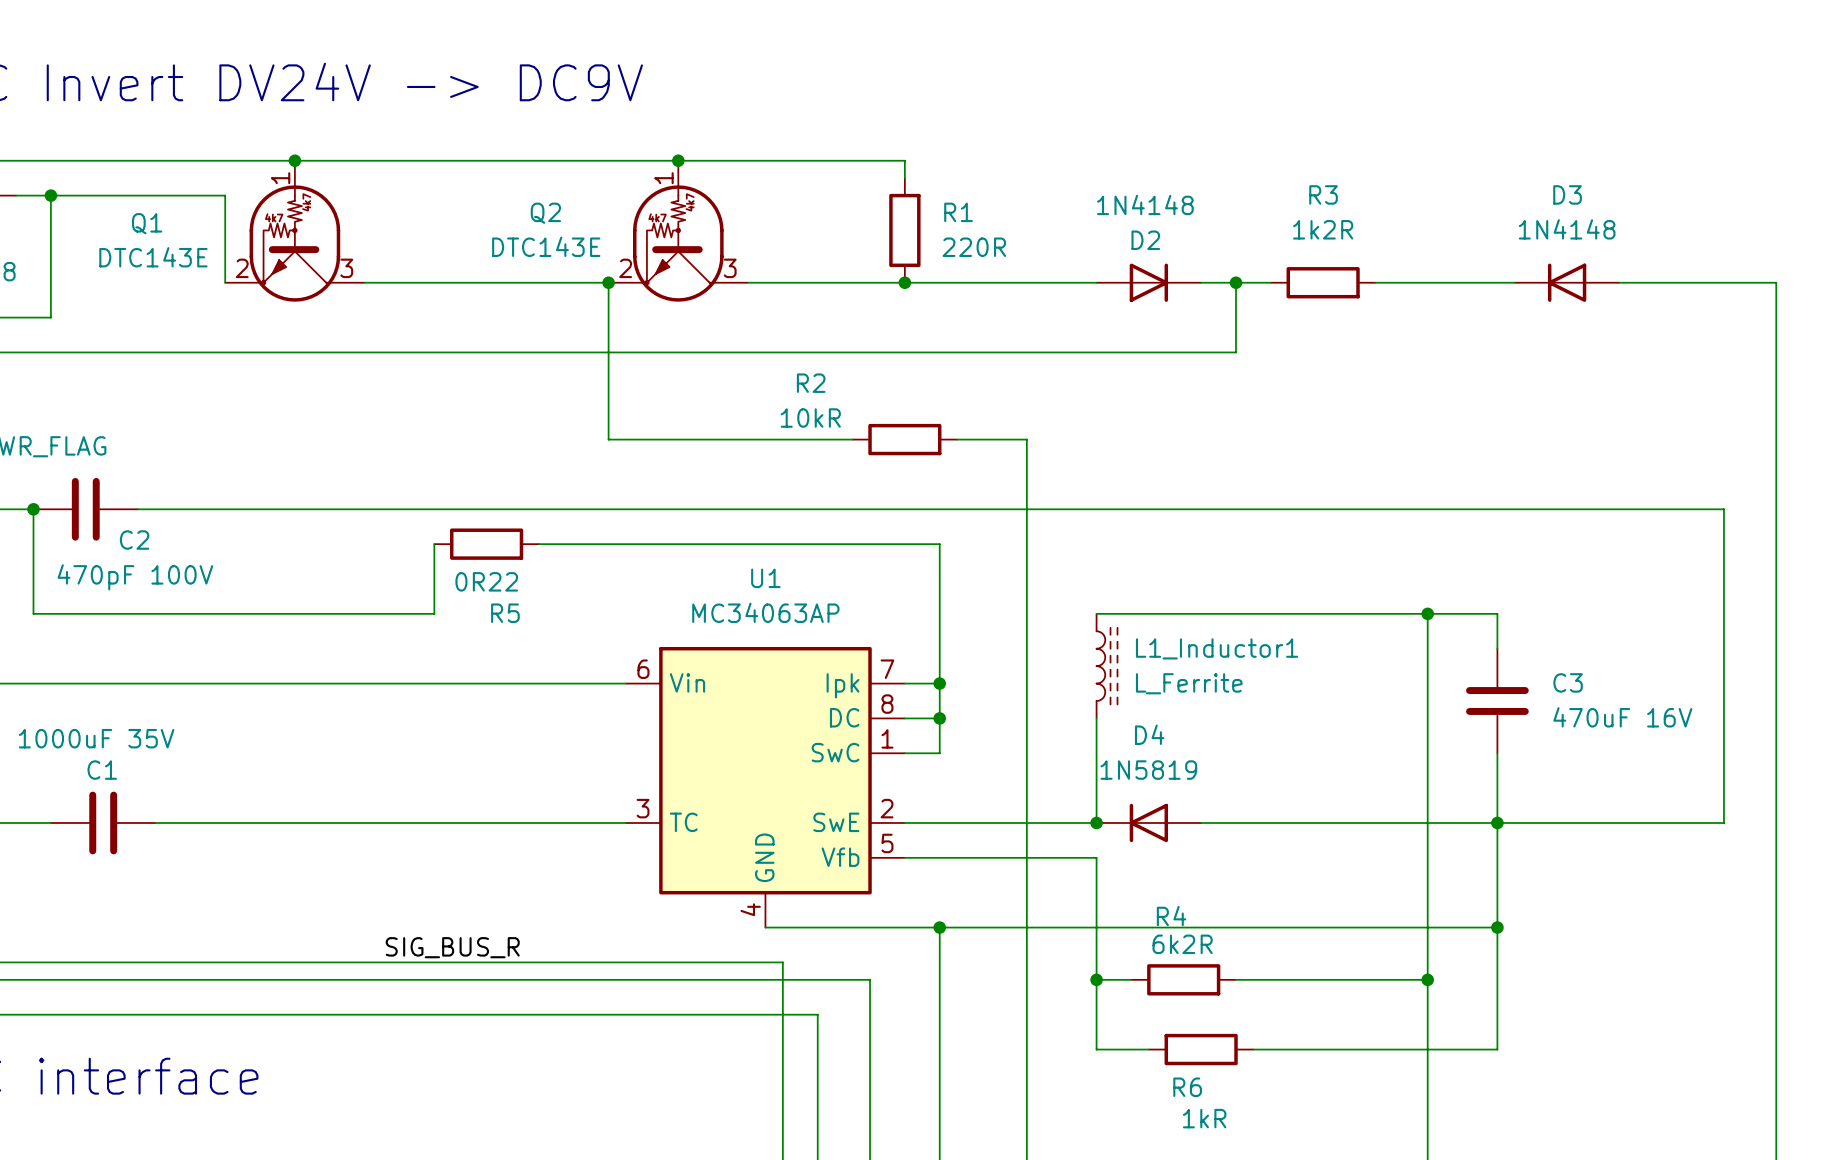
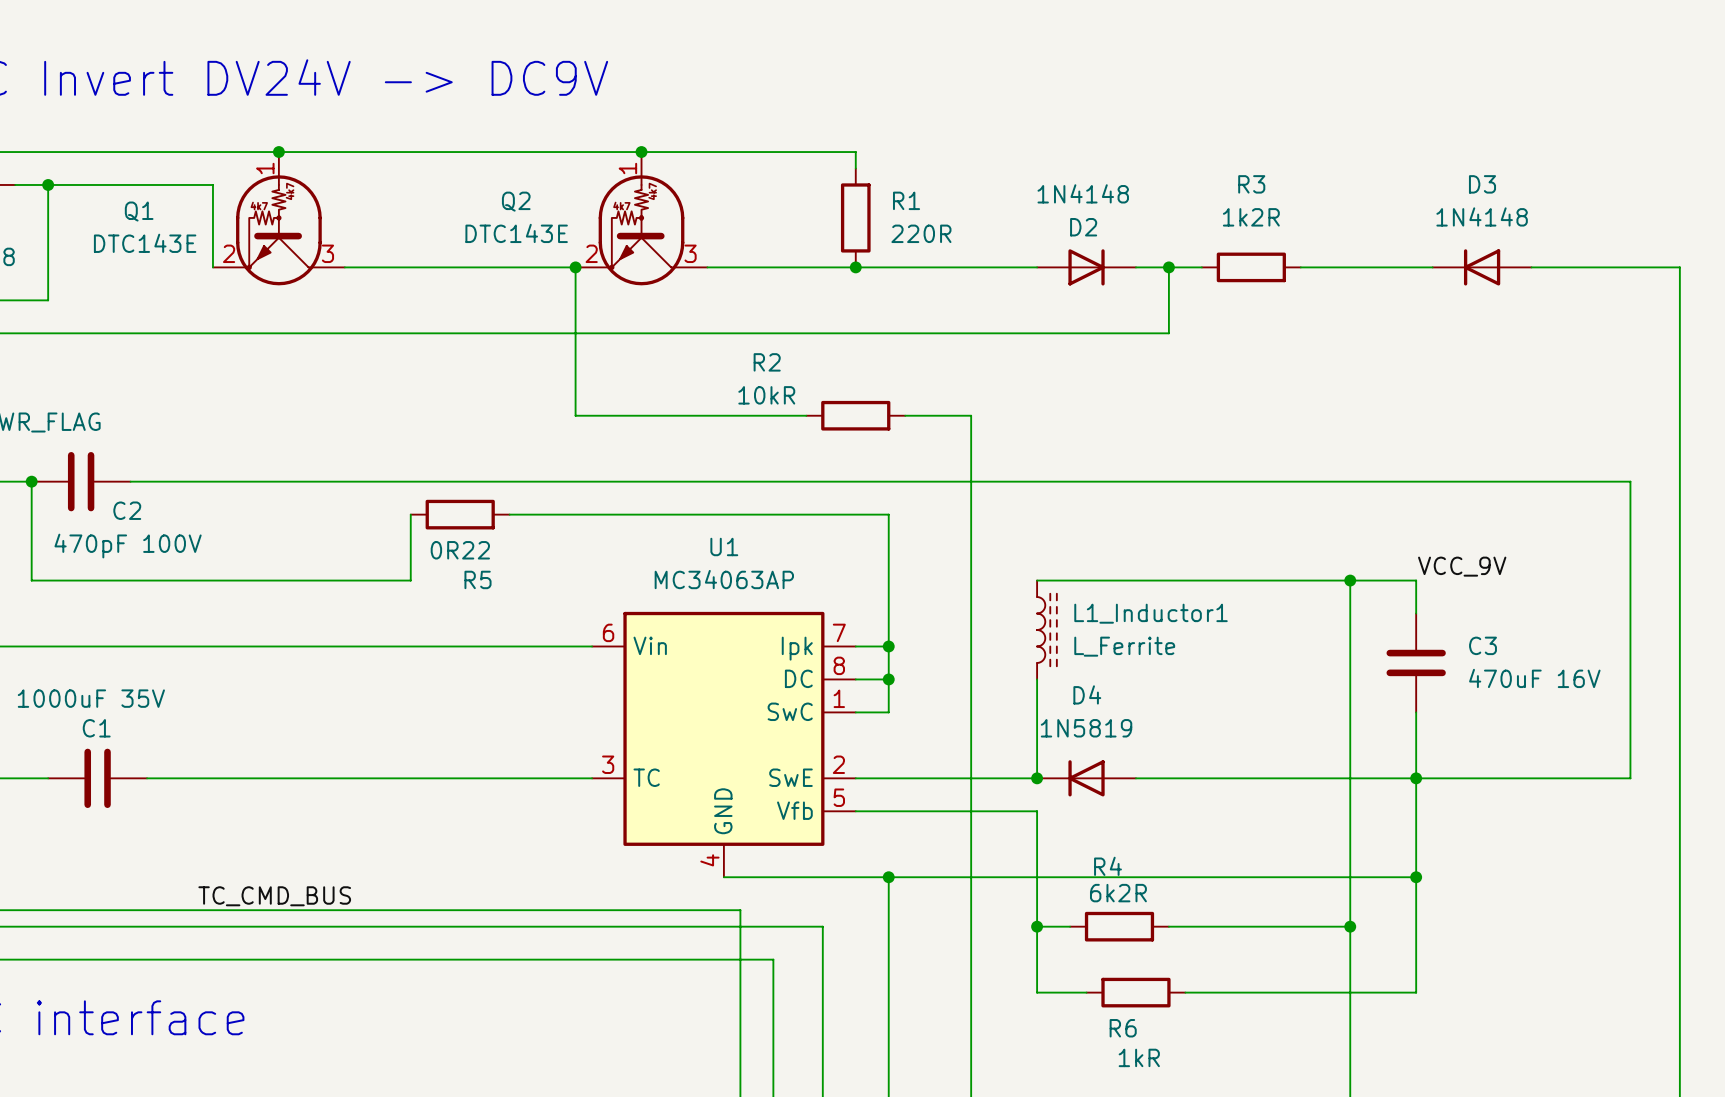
label: none -> VCC_9V (1462, 566)
label: none -> TC_CMD_BUS (274, 896)
label: SIG_BUS_R (452, 947) -> none

